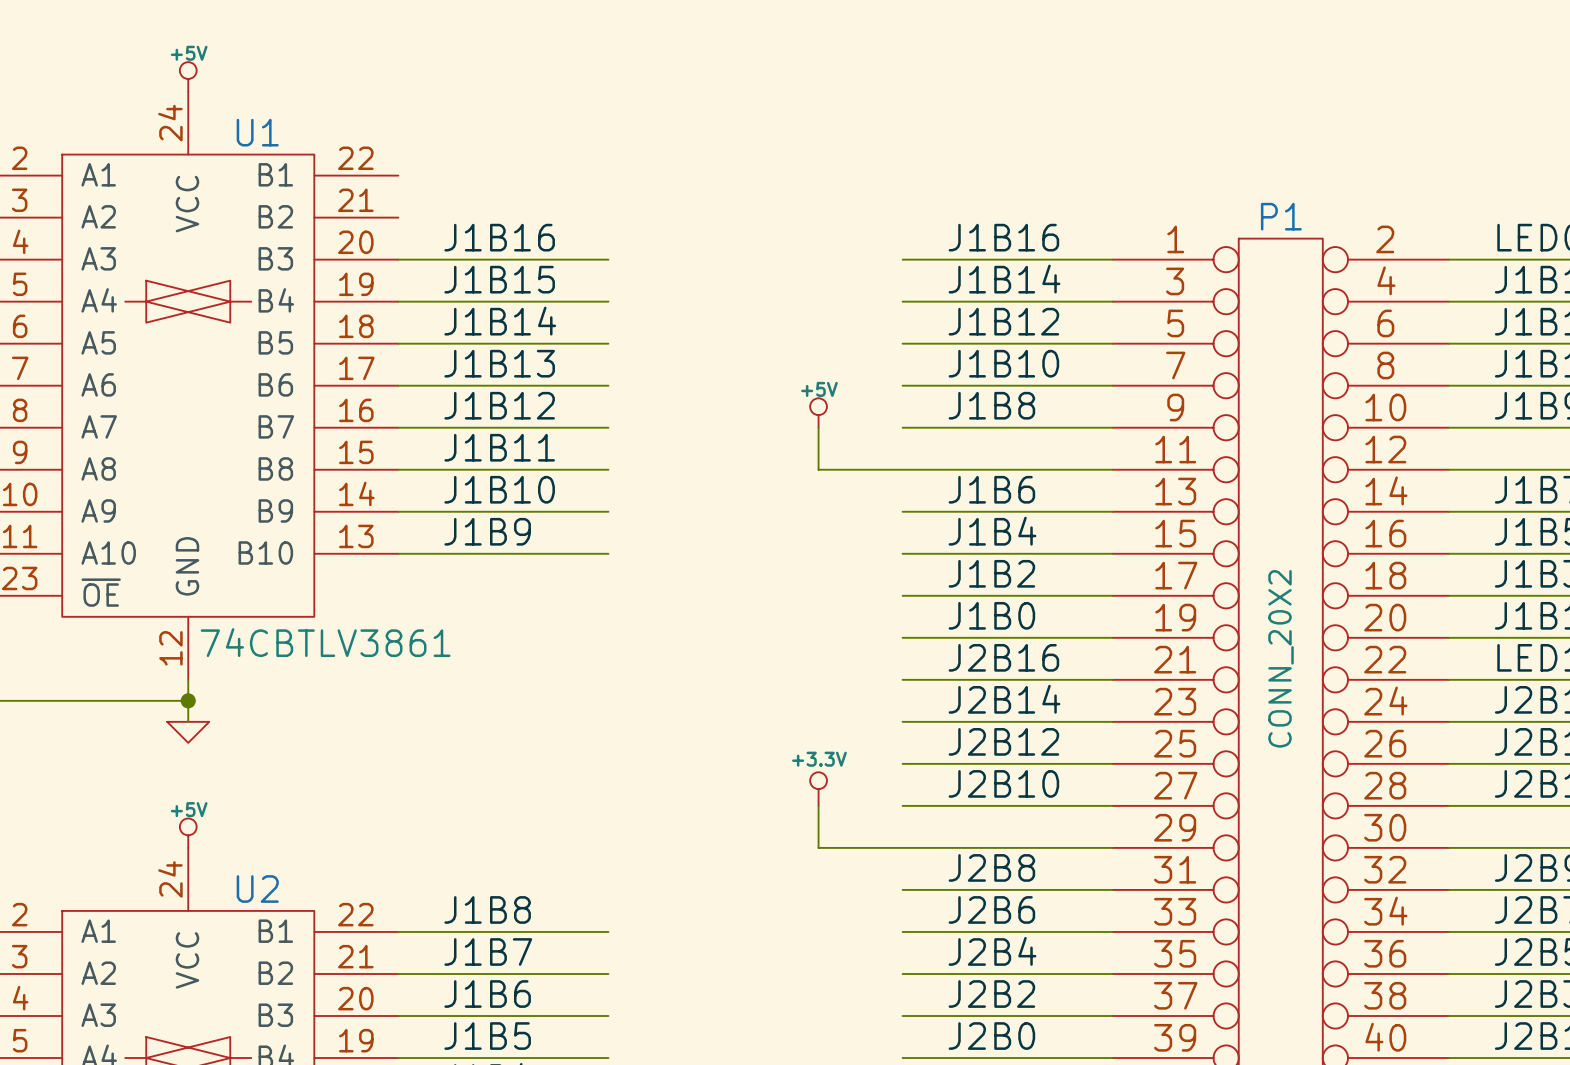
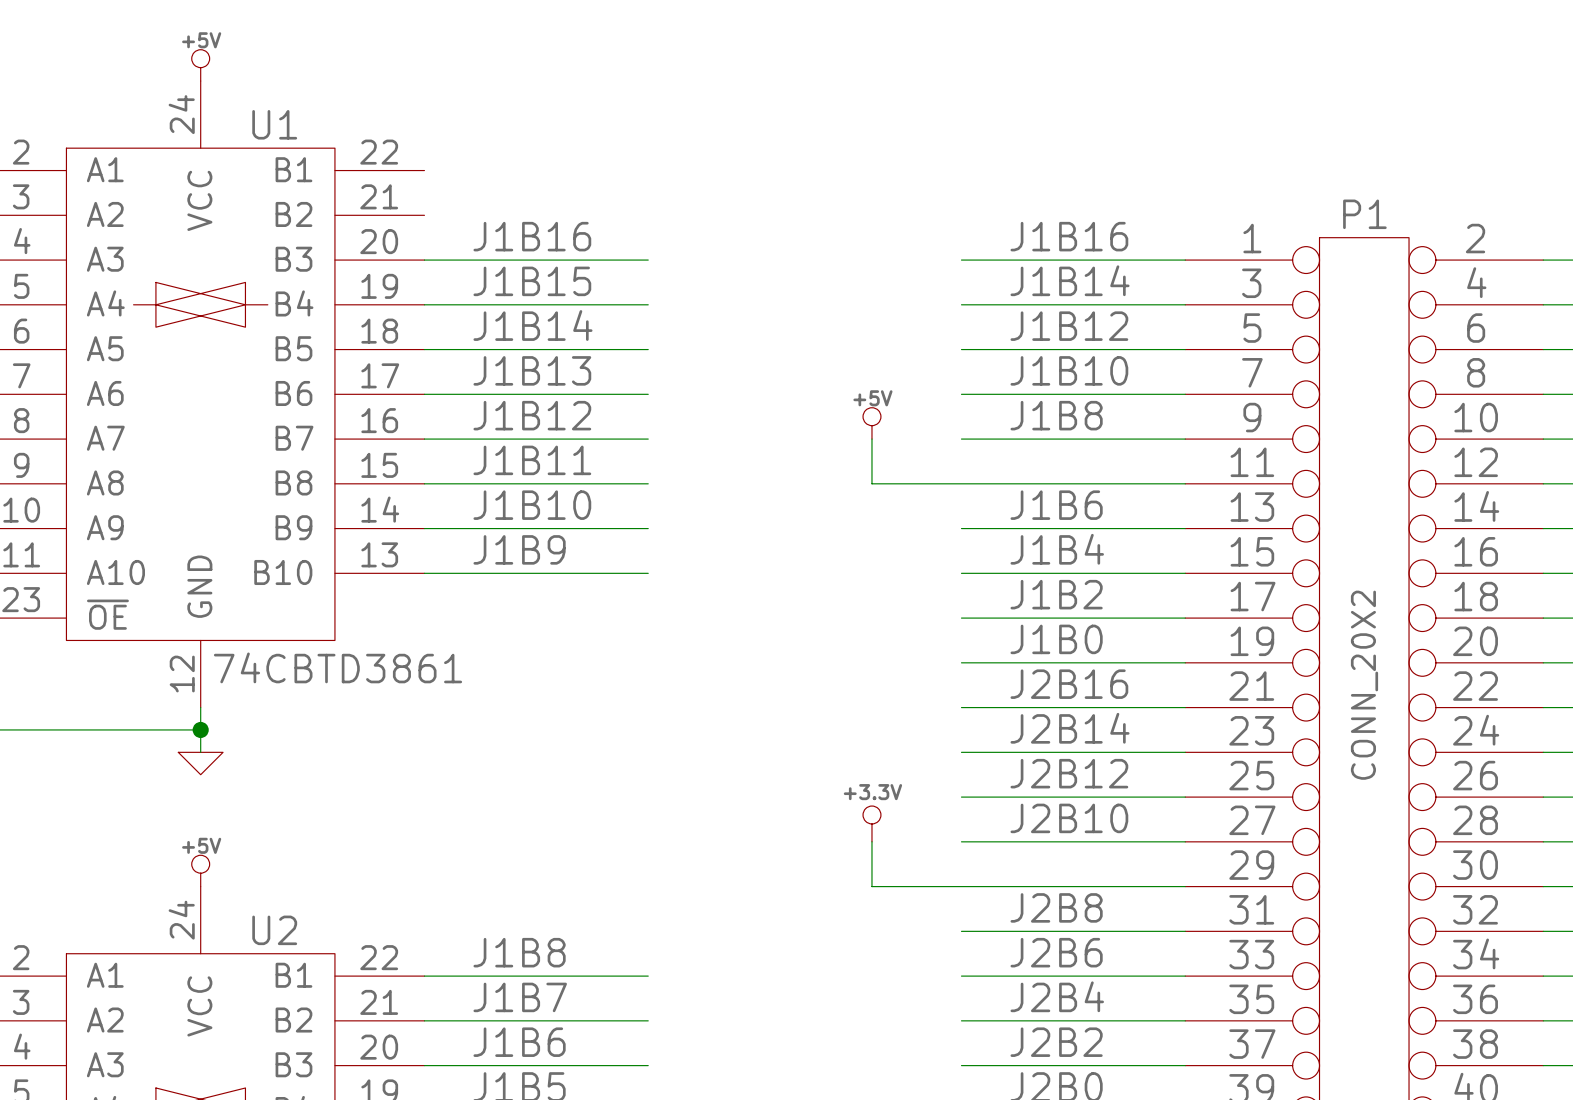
U1 value: 74CBTLV3861 (325, 642) -> 74CBTD3861 (338, 667)

